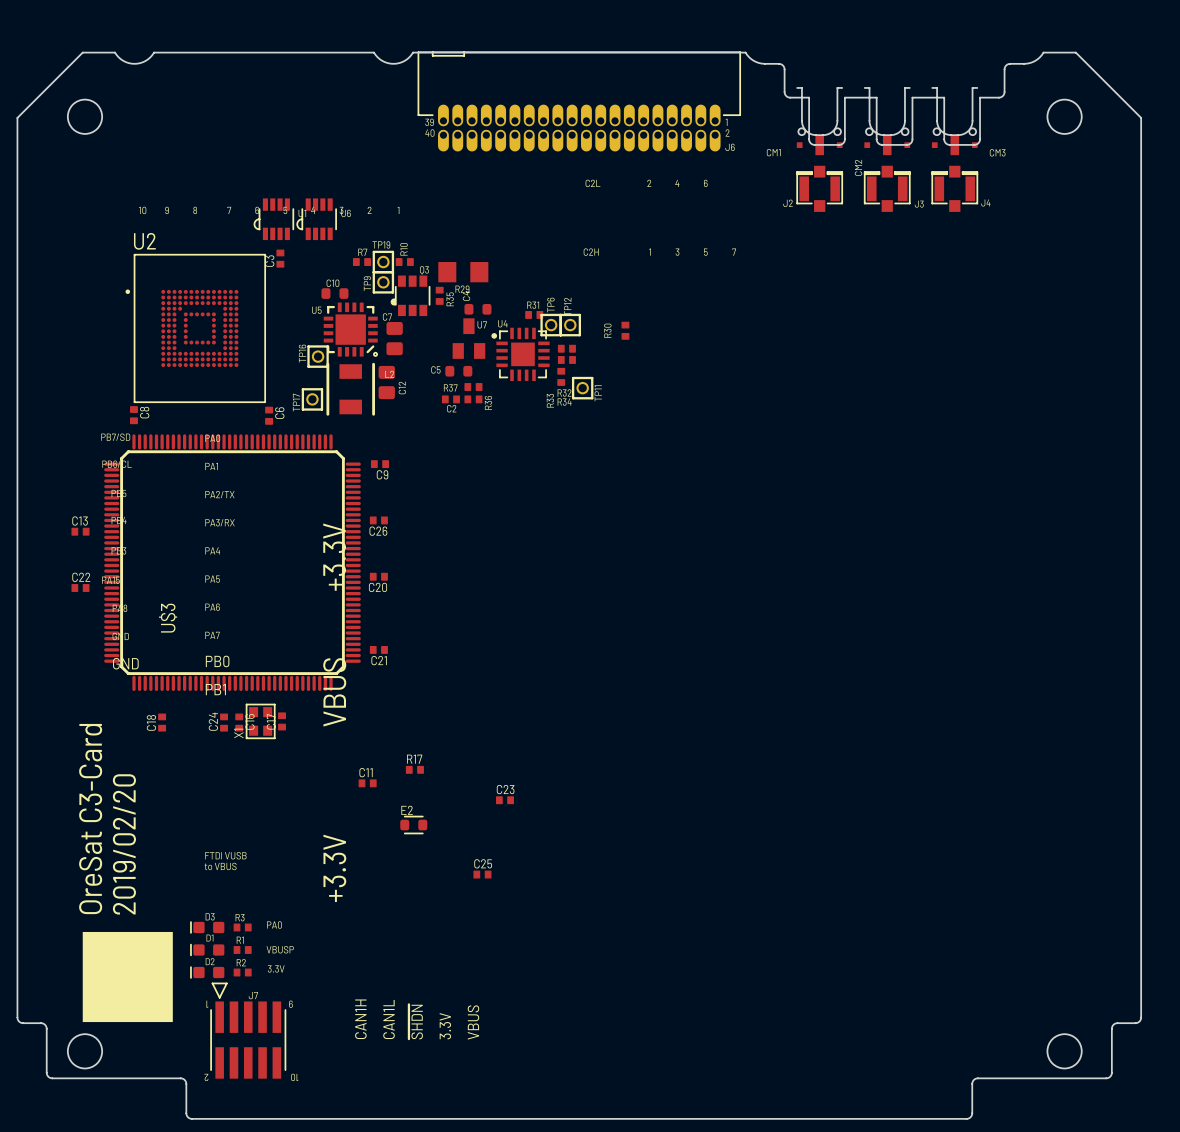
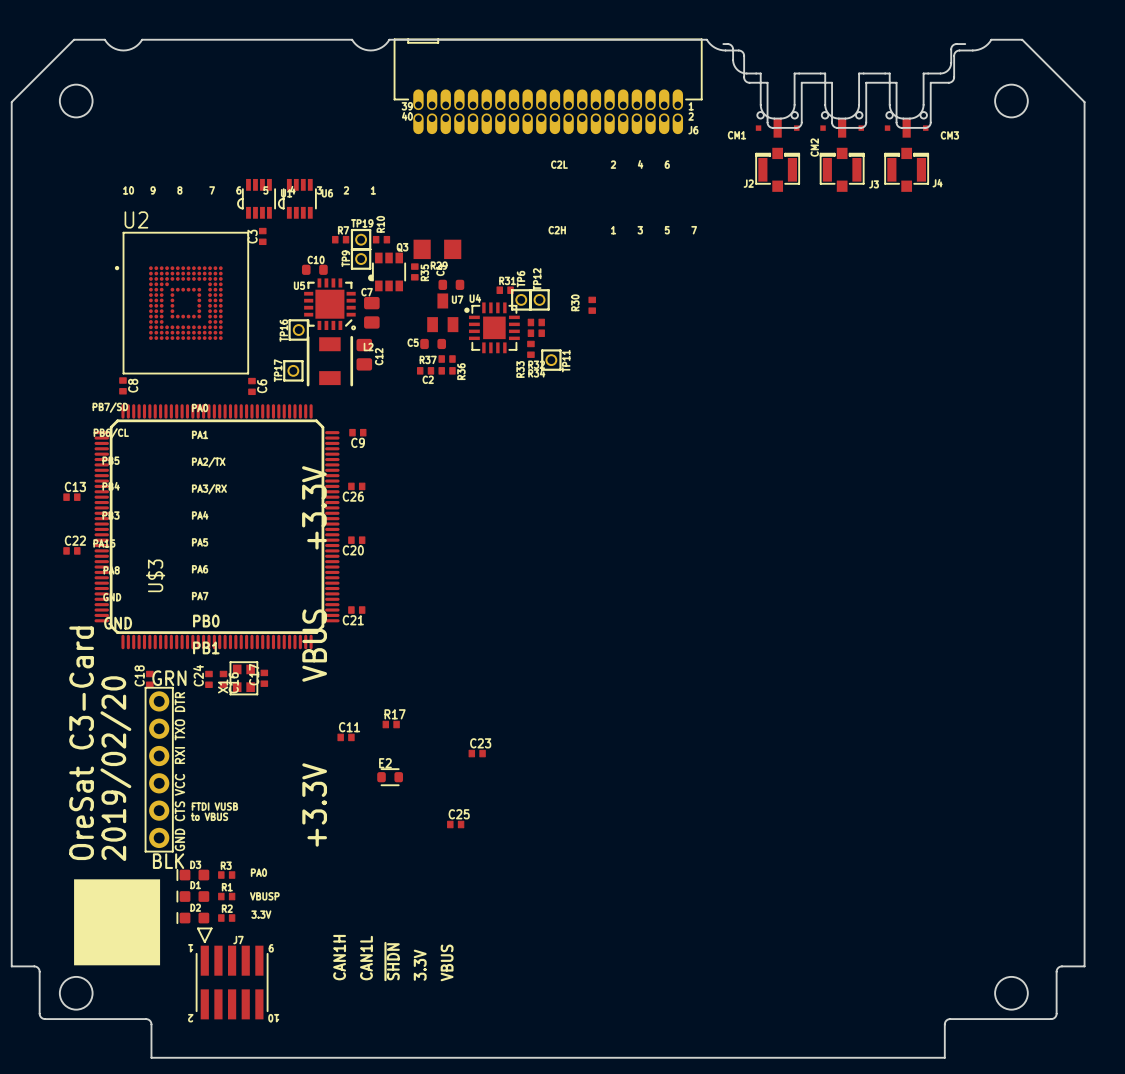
drawing shape: [17, 52, 1142, 1119] -> [11, 39, 1085, 1058]
board edge: none -> (723, 44) (732, 46) (733, 63) (737, 69) (743, 73) (756, 73)
board edge: none -> (965, 44) (952, 46) (950, 65) (947, 71) (941, 73) (928, 73)
board edge: none -> (799, 73) (820, 73)
board edge: none -> (863, 73) (885, 73)
part: none -> (159, 769)

